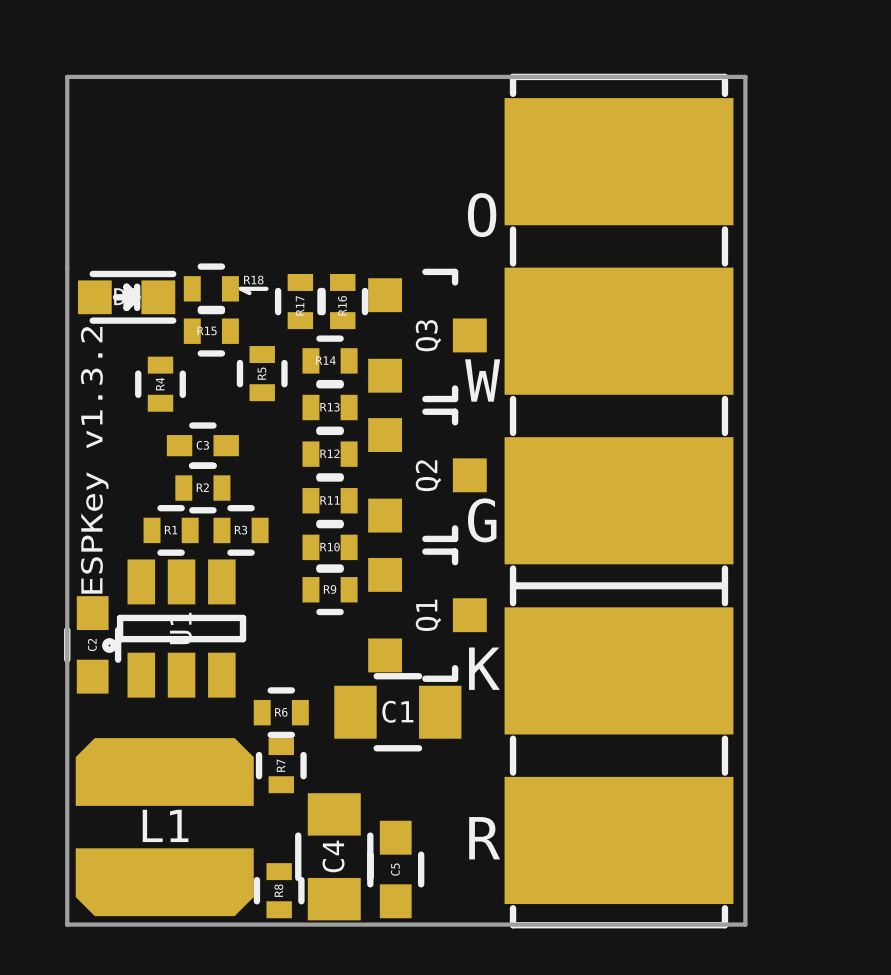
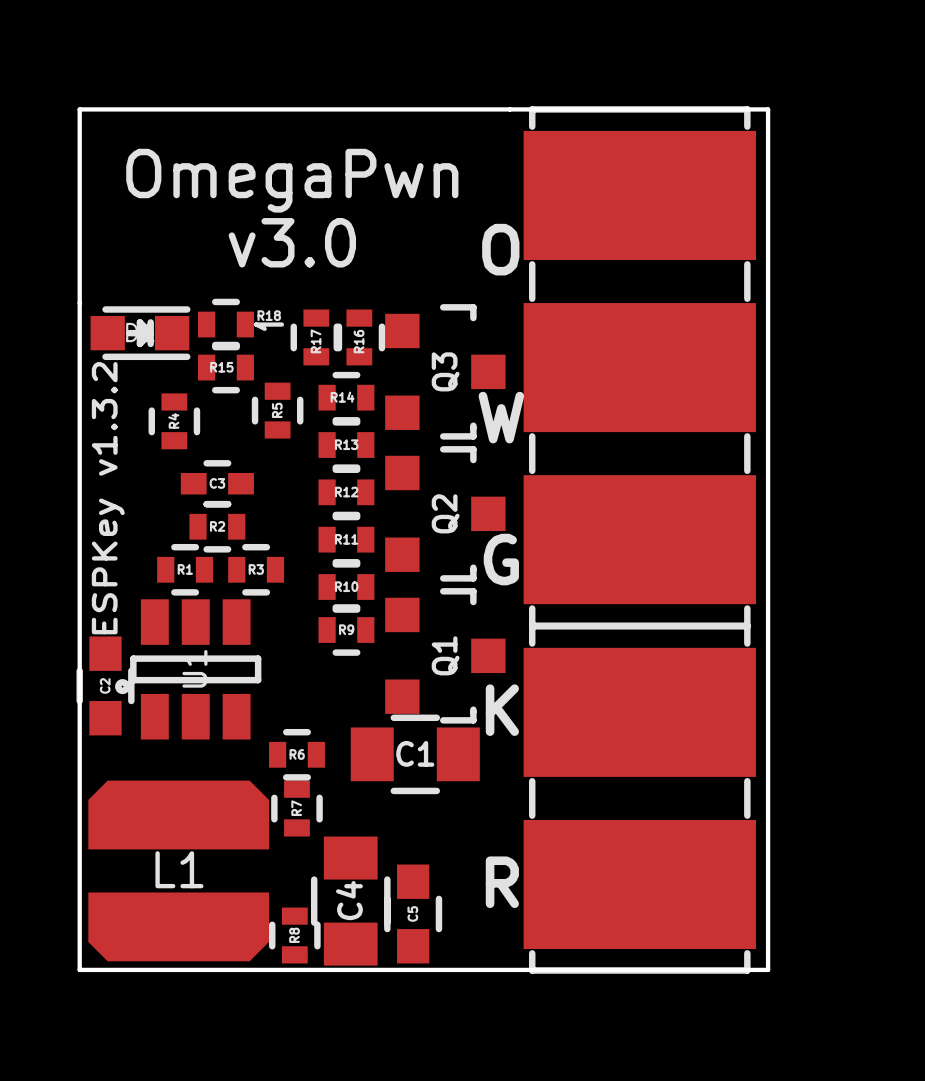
text: none -> OmegaPwn (292, 180)
text: none -> v3.0 (292, 242)

